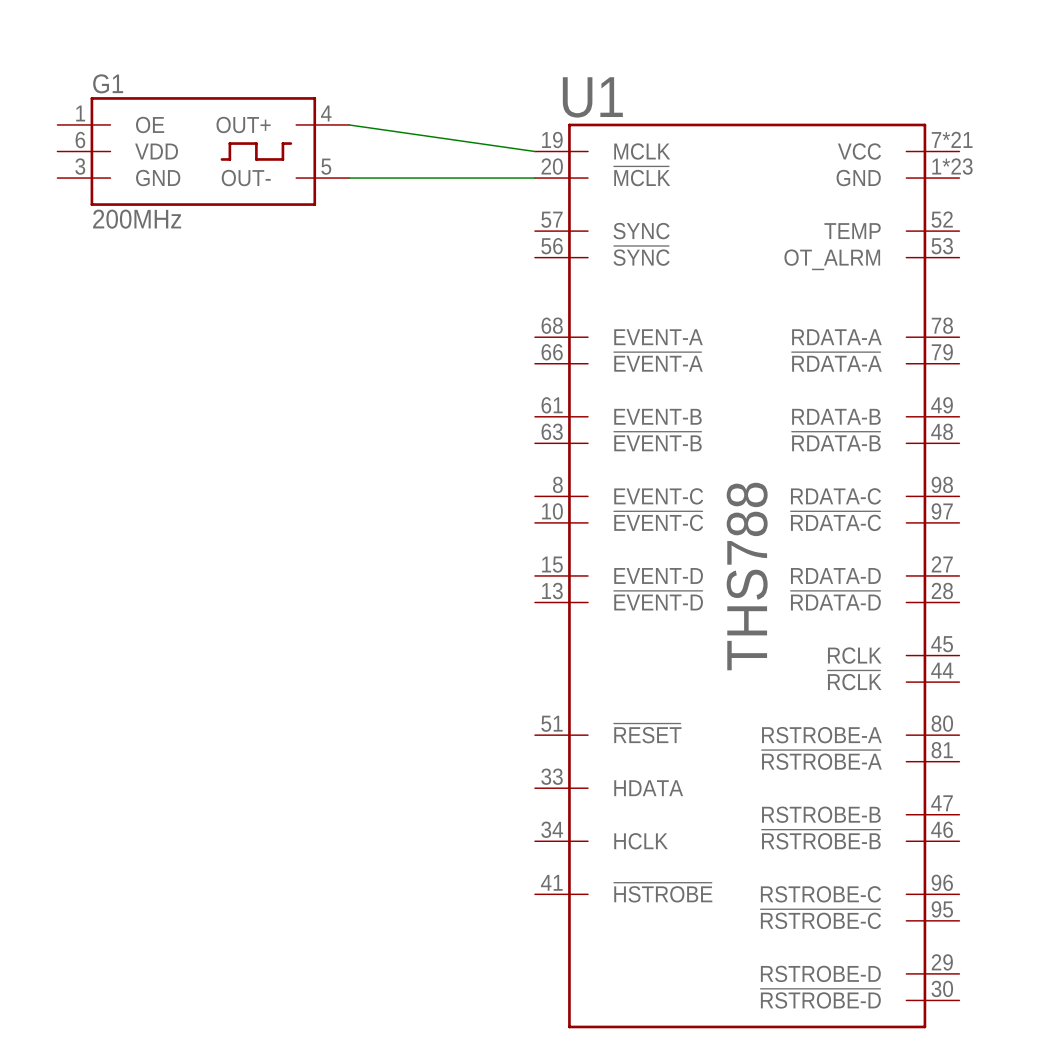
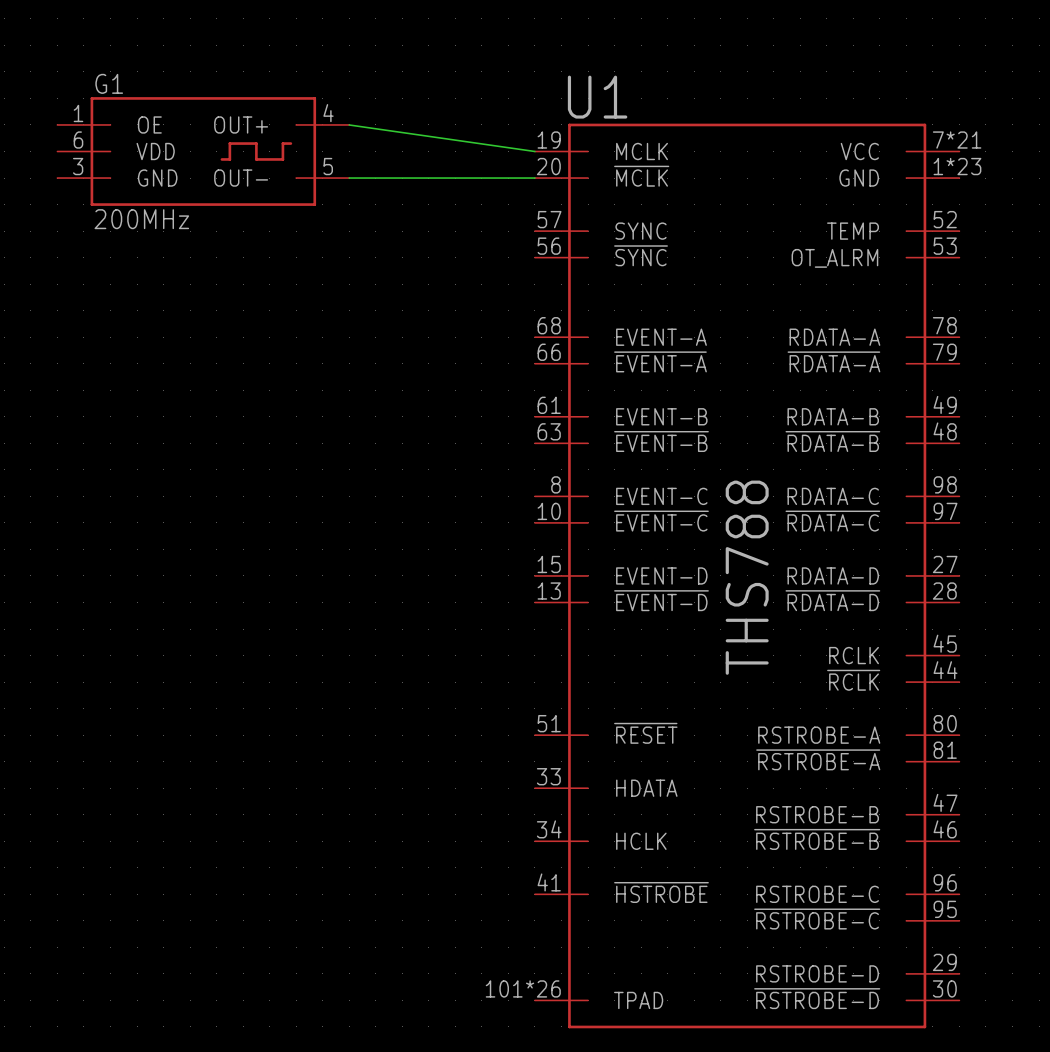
U1 symbol: [534, 123, 960, 1029] -> [534, 123, 960, 1029]

